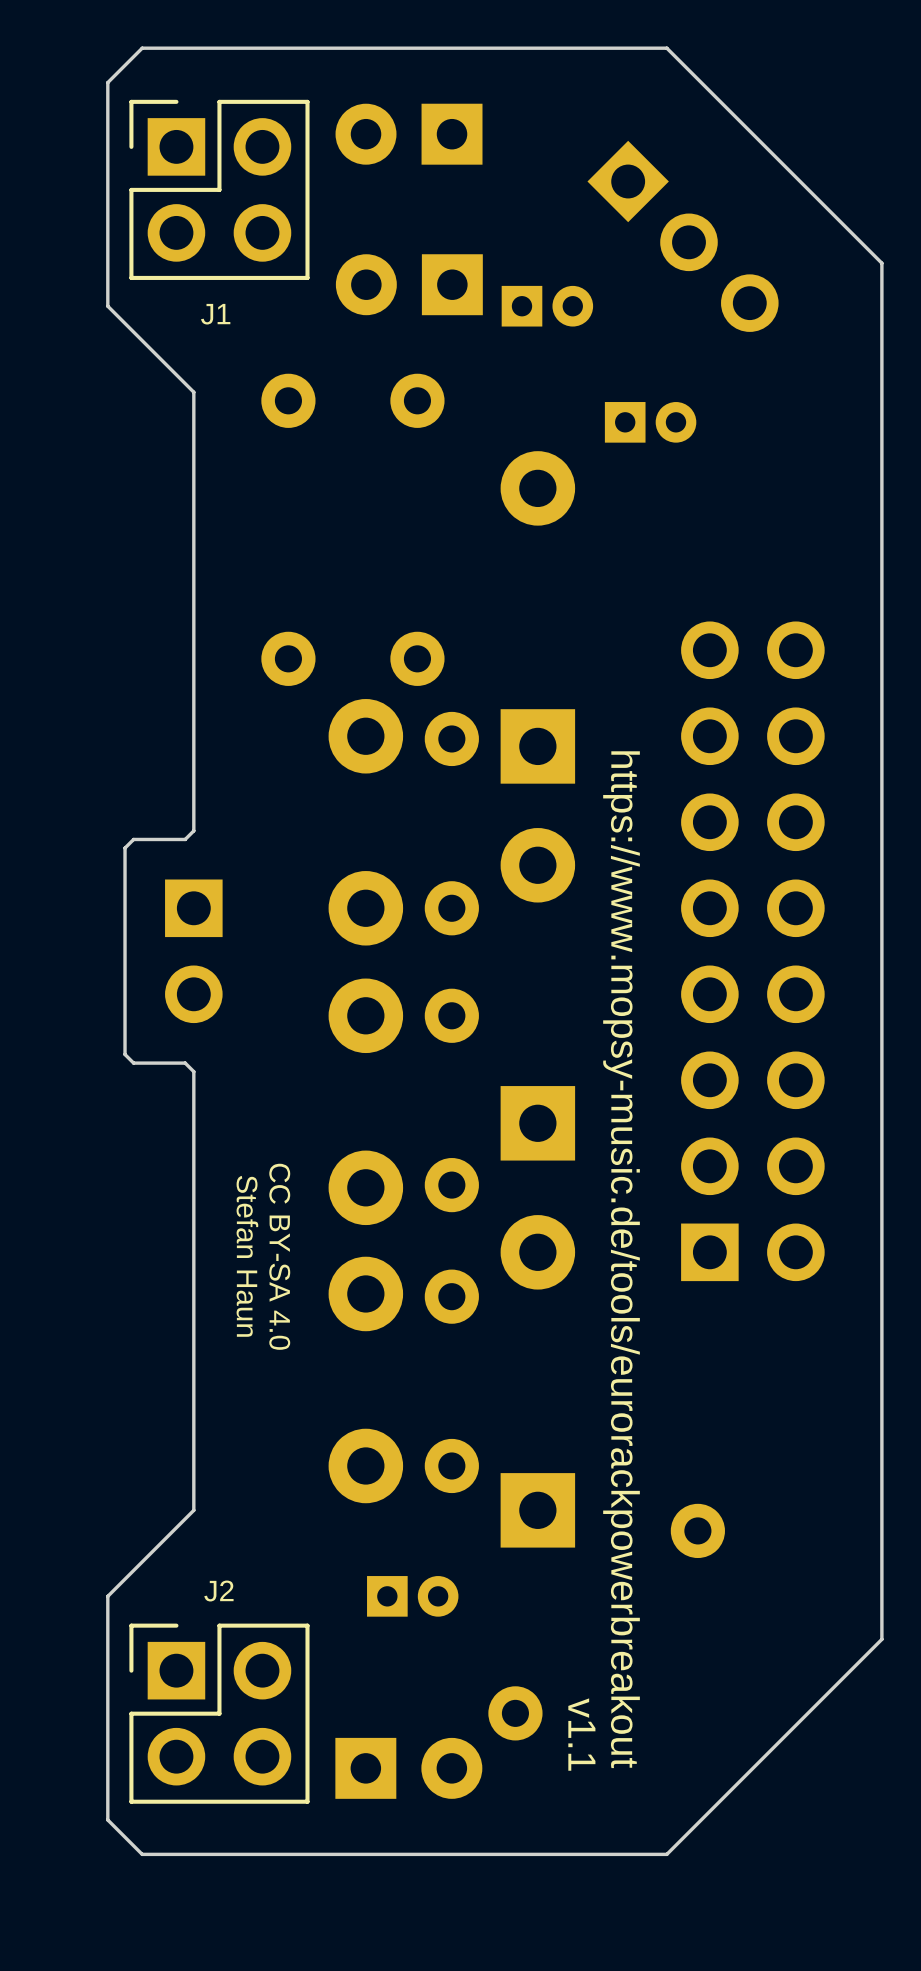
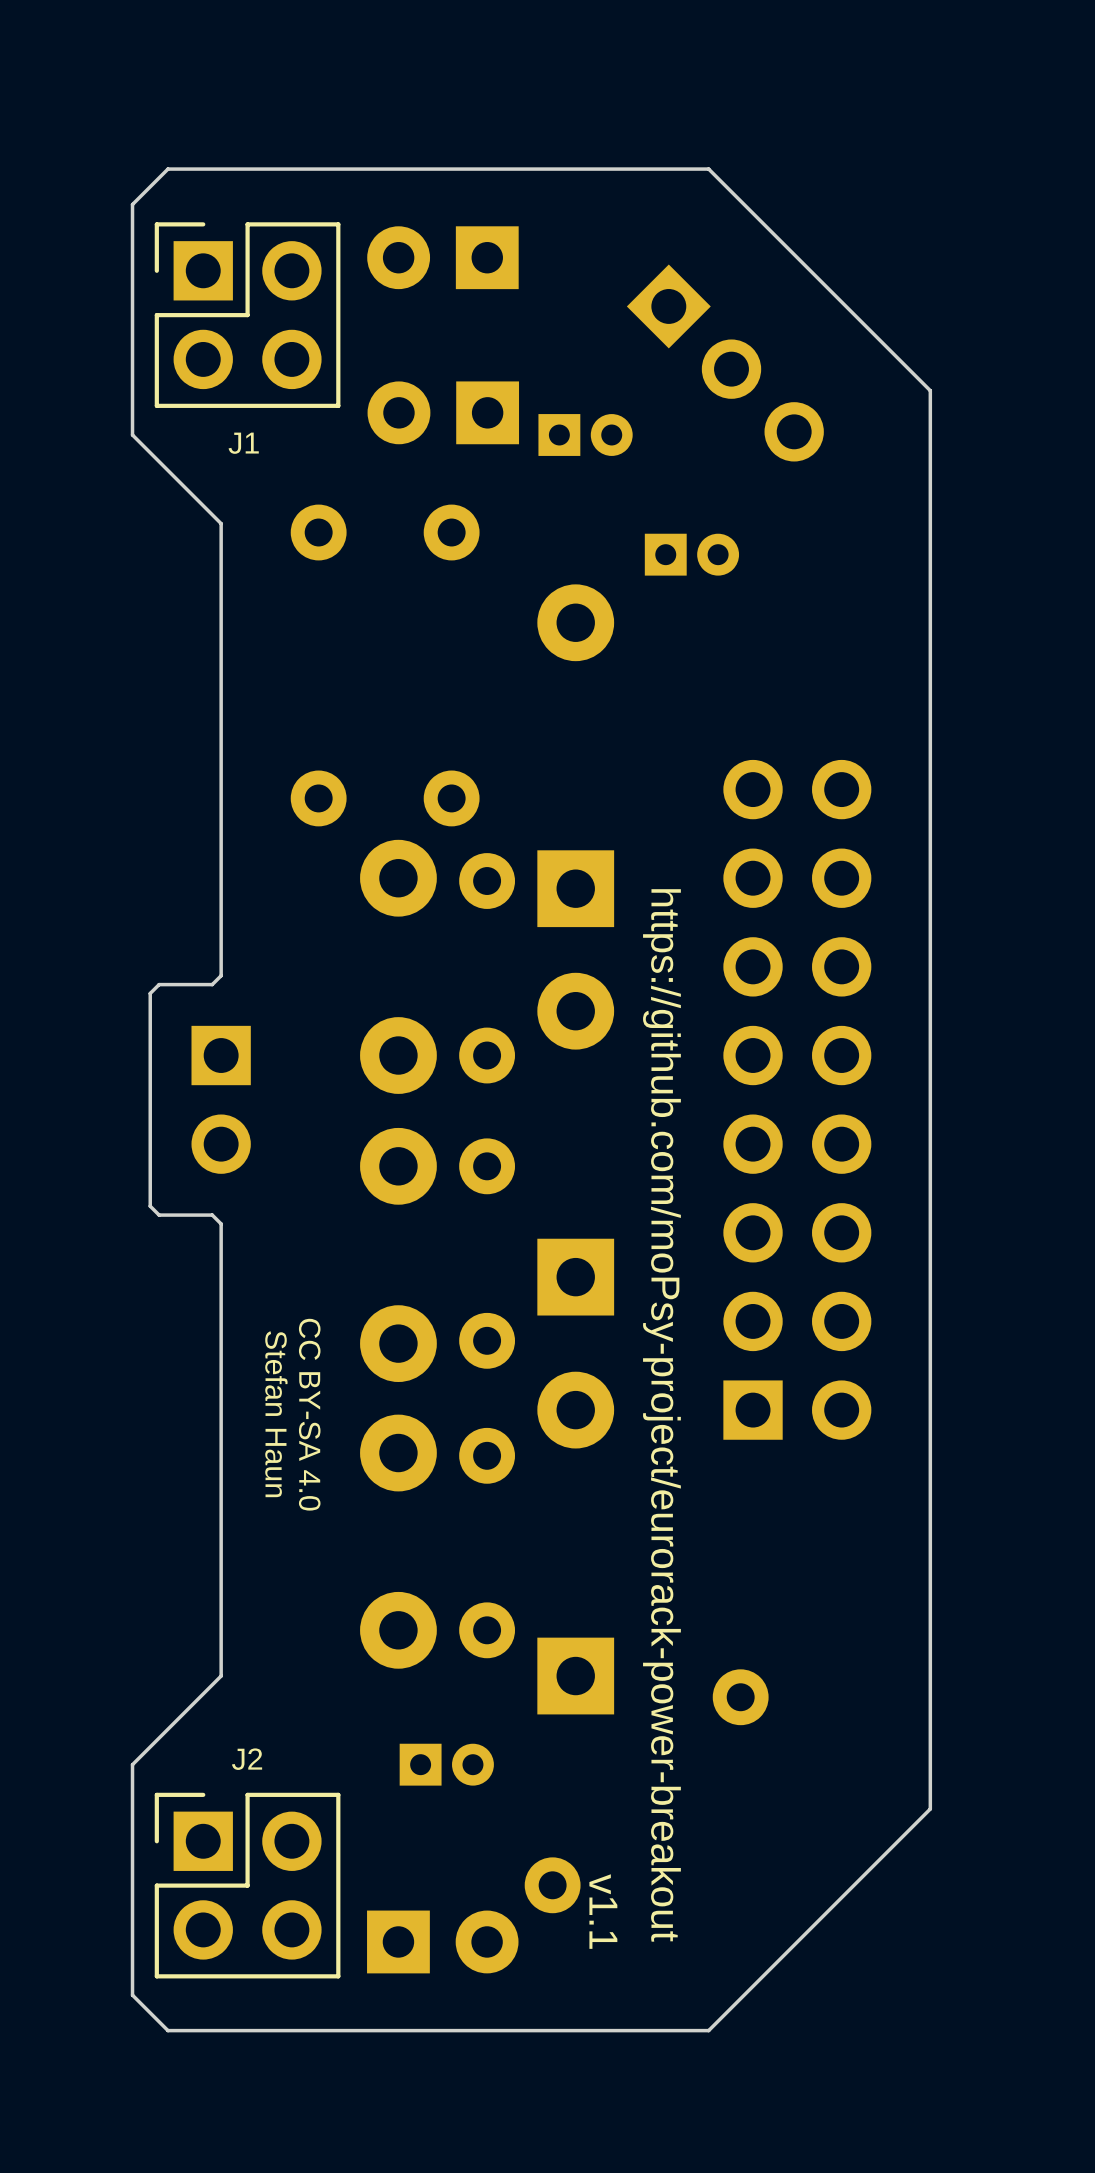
text: https://www.mopsy-music.de/tools/eurorackpowerbreakout (621, 1259) -> https://github.com/moPsy-project/eurorack-power-breakout (661, 1415)
text position: v1.1 (581, 1734) -> v1.1 (603, 1911)

